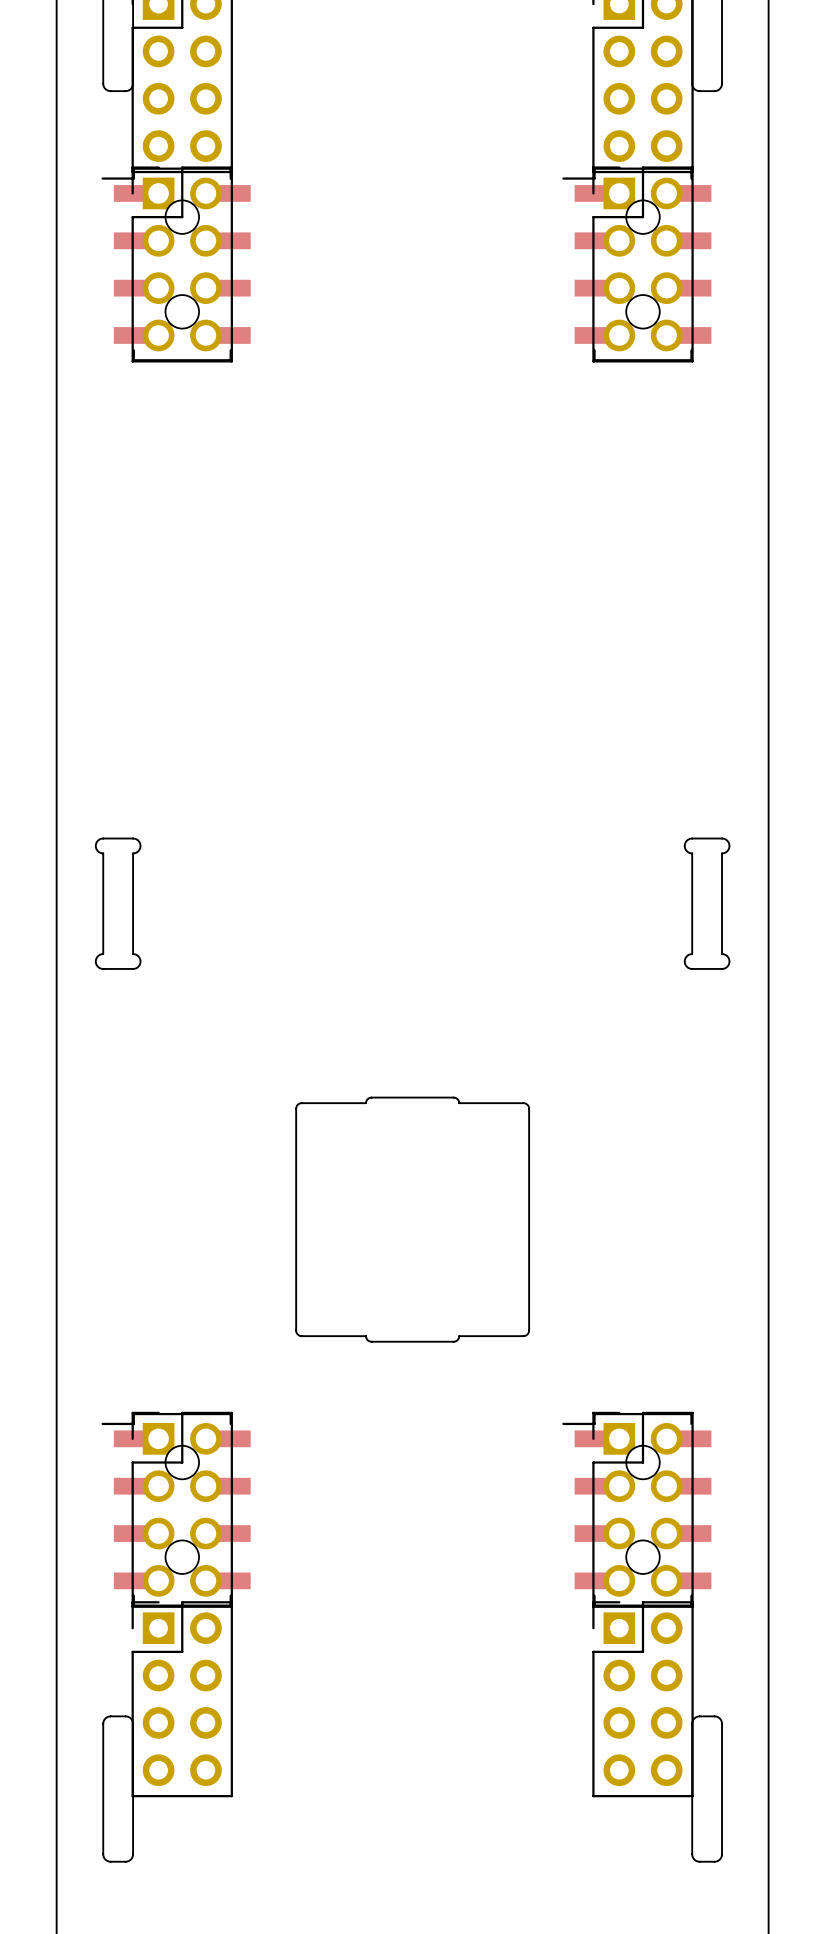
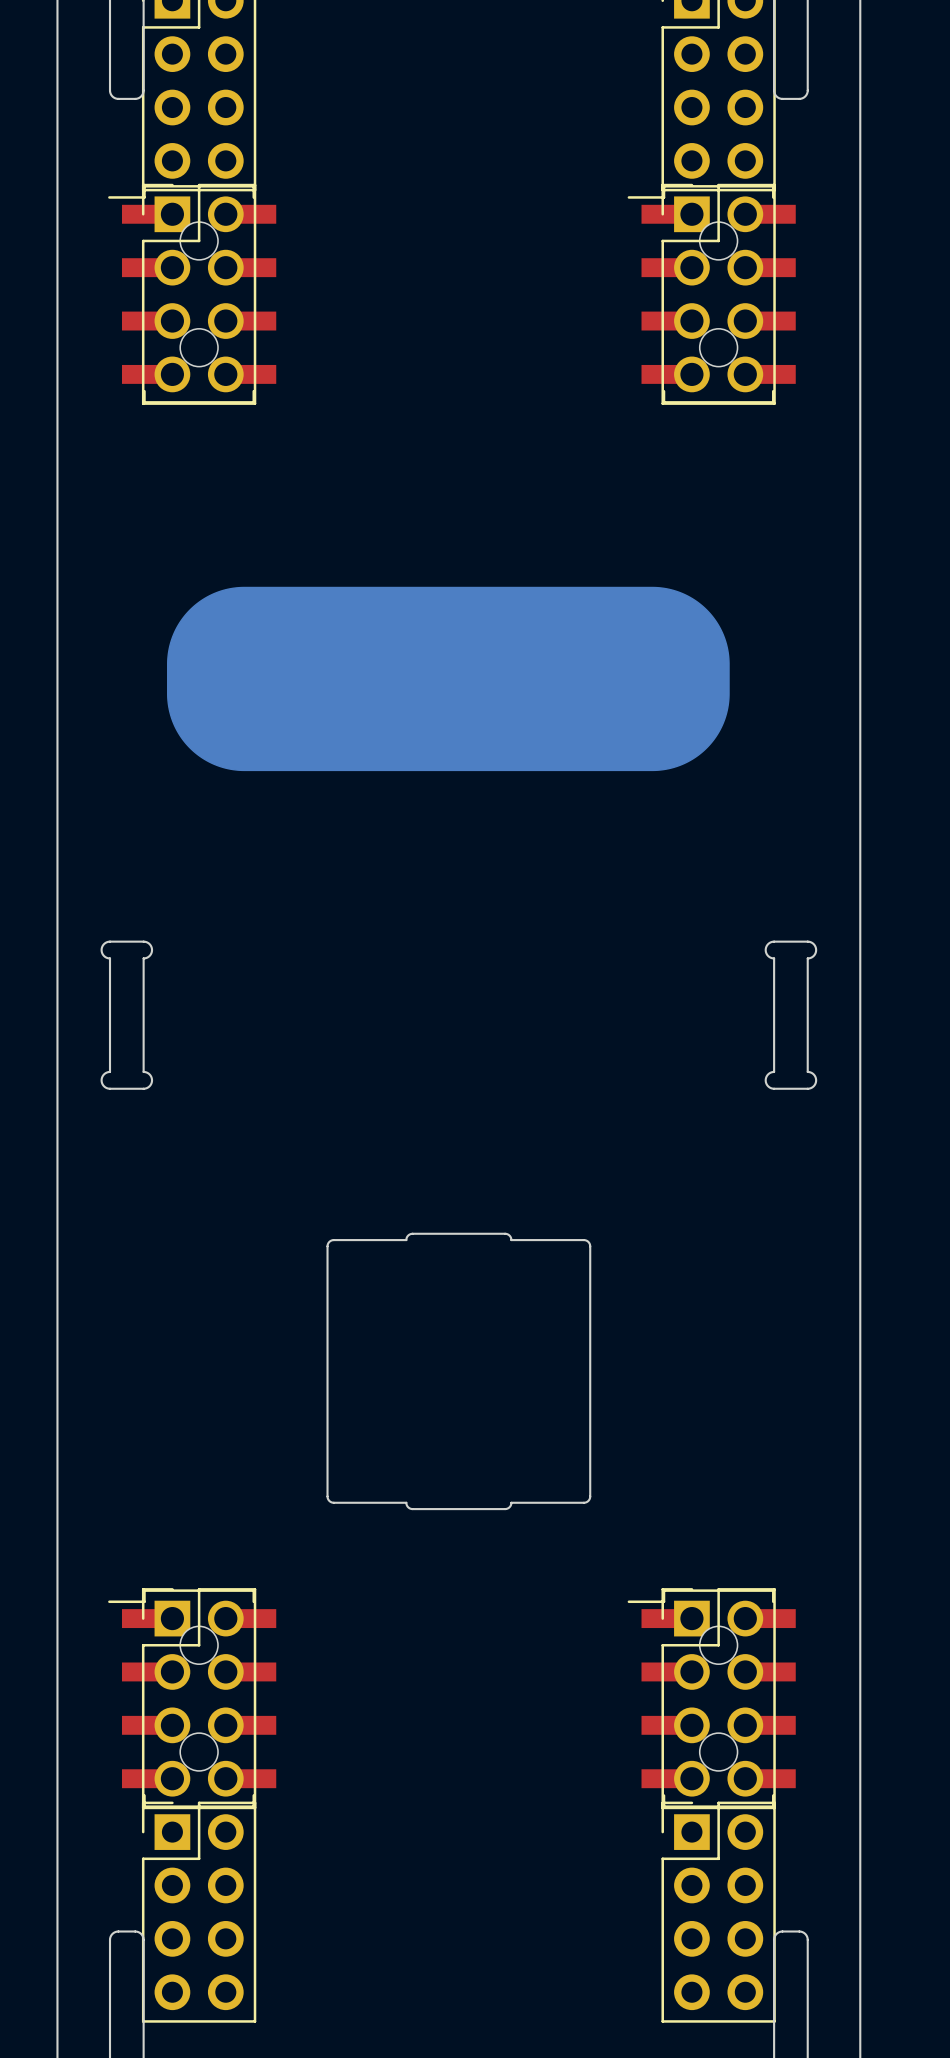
drawing: none -> [167, 586, 730, 772]

